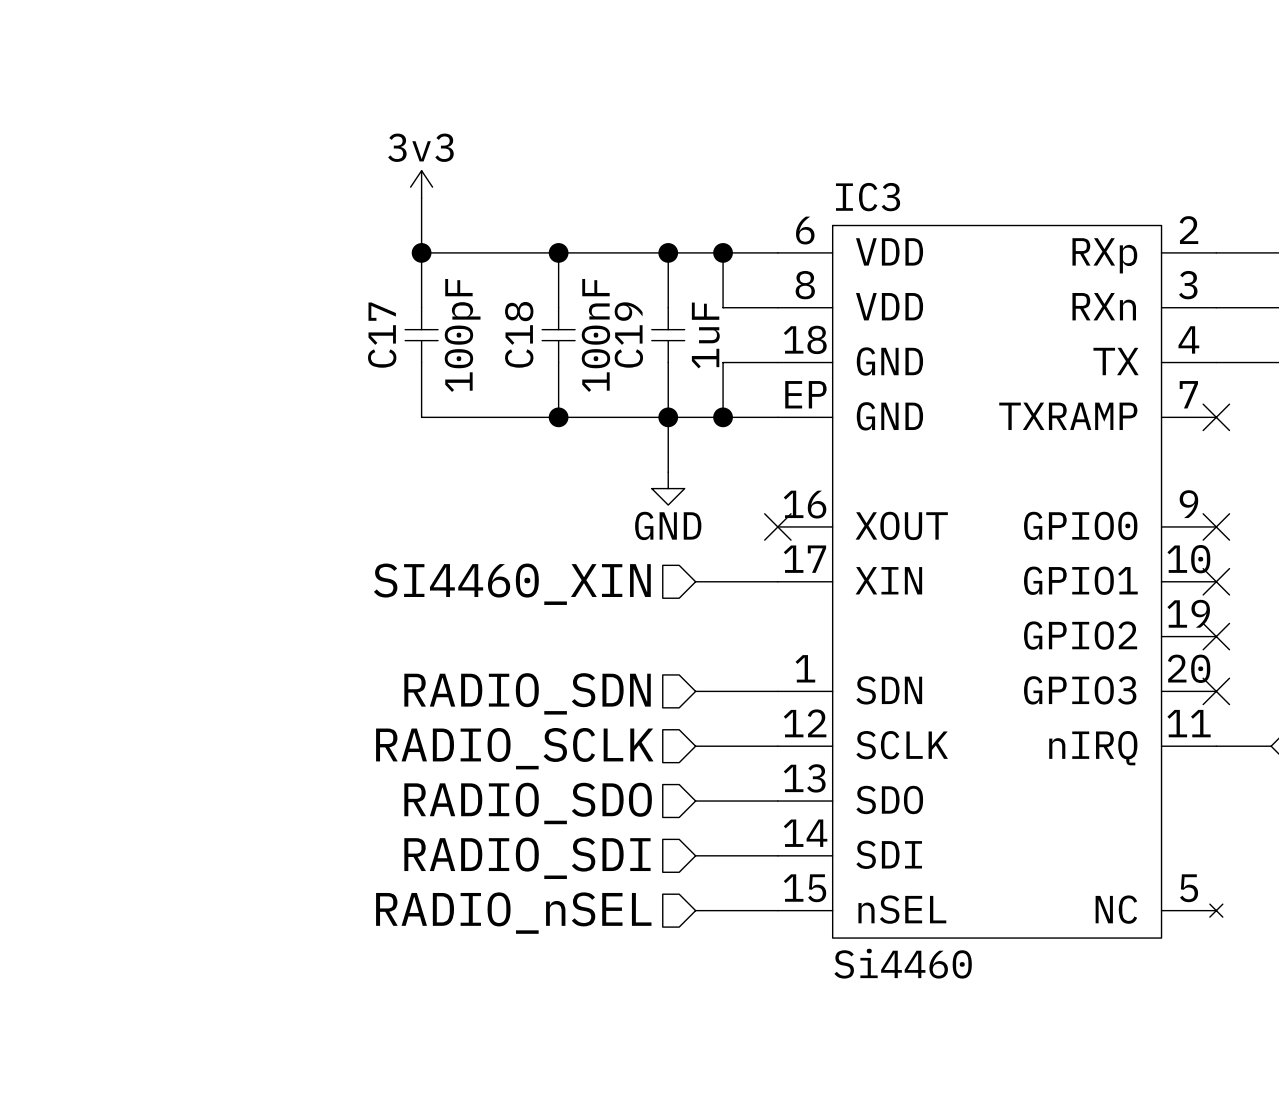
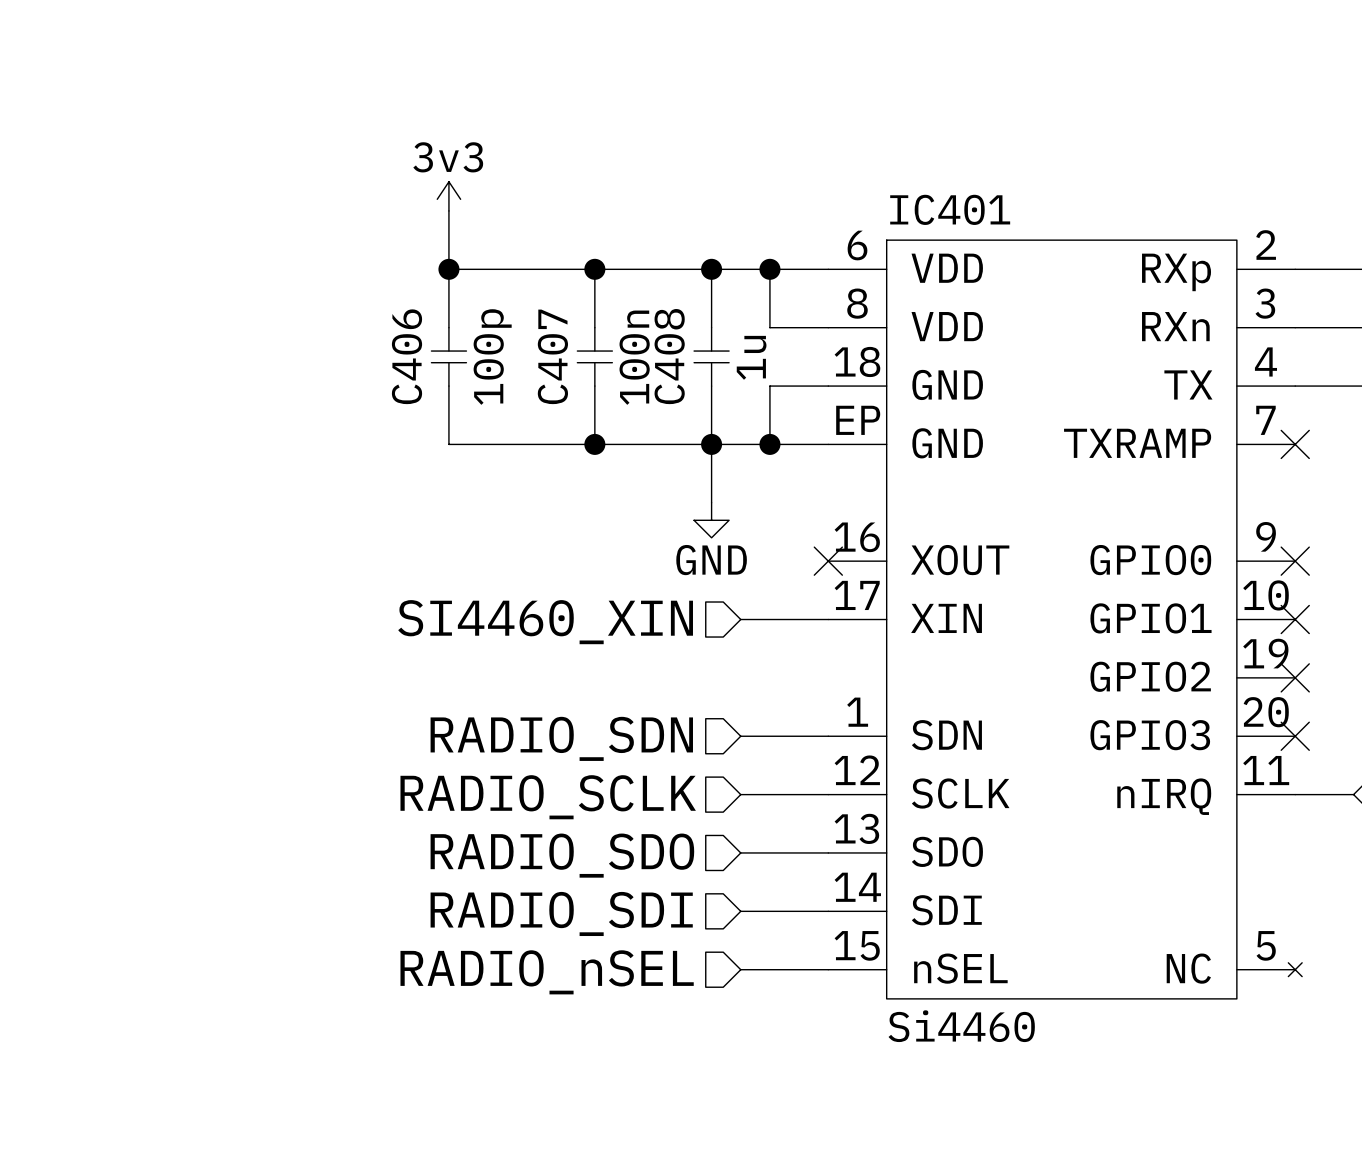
IC3 name: IC3 (868, 197) -> IC401 (950, 209)
C18 name: C18 (519, 334) -> C407 (552, 356)
C17 name: C17 (382, 335) -> C406 (407, 356)
C17 value: 100pF (462, 335) -> 100p (492, 357)
C18 value: 100nF (595, 335) -> 100n (634, 357)
C19 name: C19 (628, 335) -> C408 (669, 356)
C19 value: 1uF (705, 335) -> 1u (751, 357)

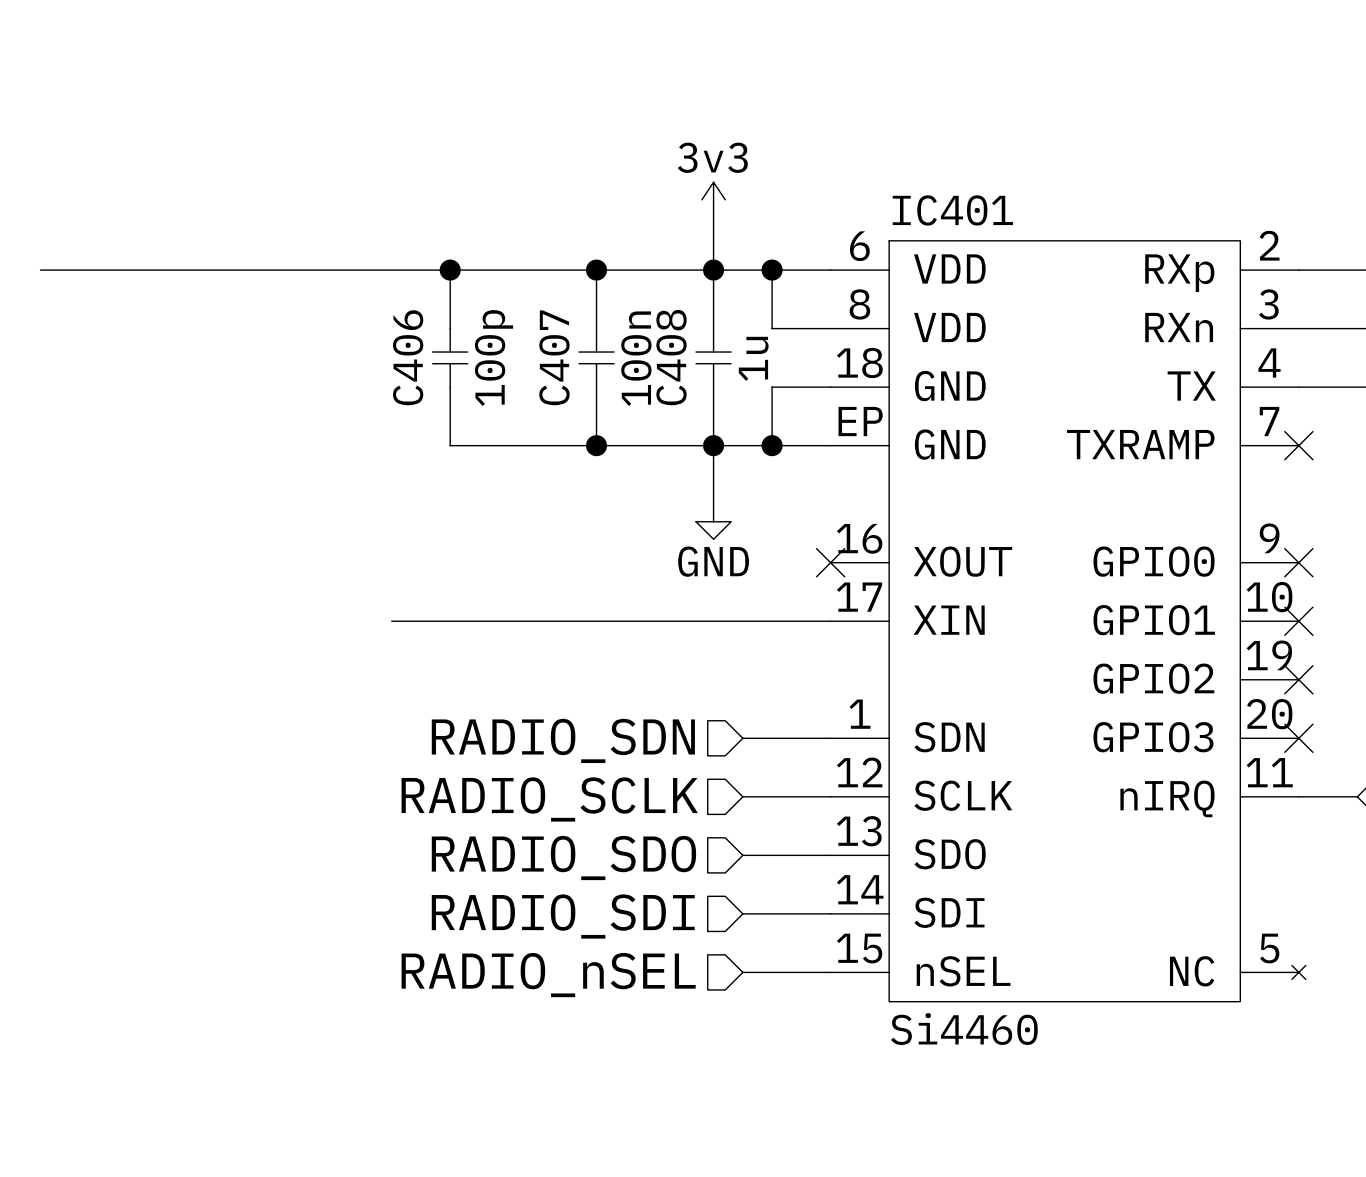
power symbol position: 3v3 (448, 196) -> 3v3 (713, 196)
wire: (448, 210) (448, 269) -> (40, 270) (450, 270)
wire: none -> (713, 211) (713, 270)
wire: none -> (391, 621) (742, 621)
hierarchical label: SI4460_XIN (545, 622) -> none

